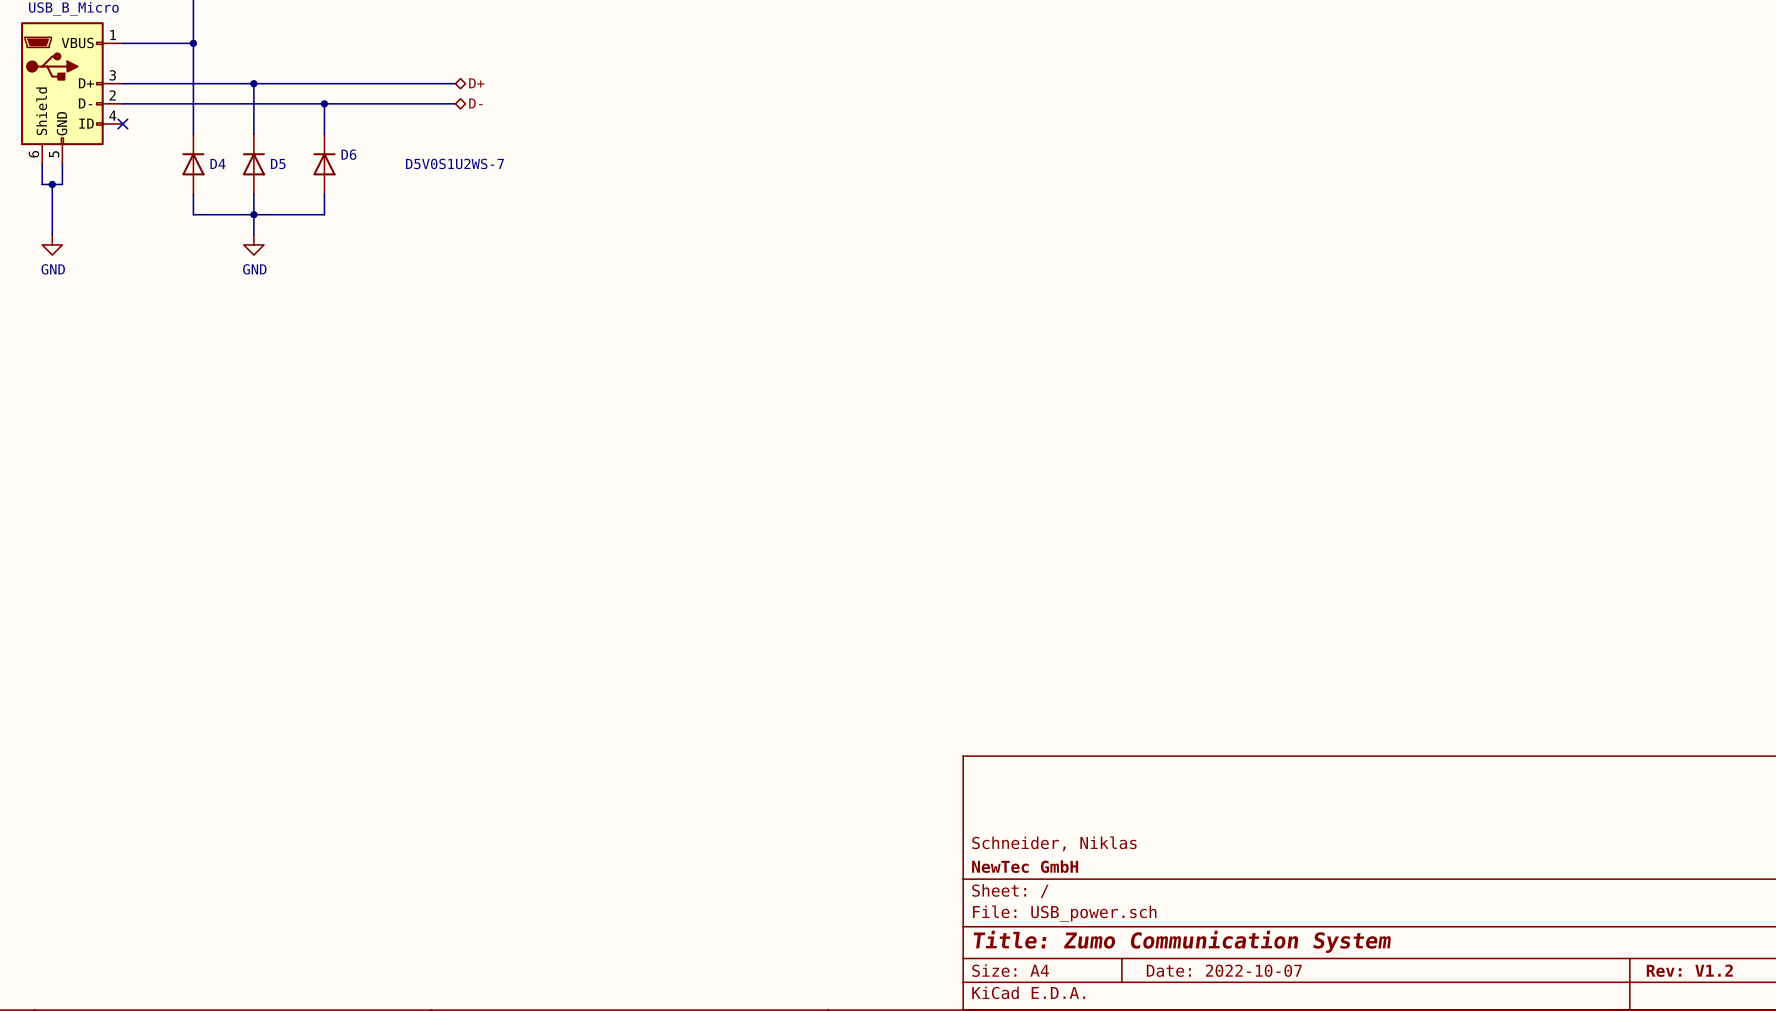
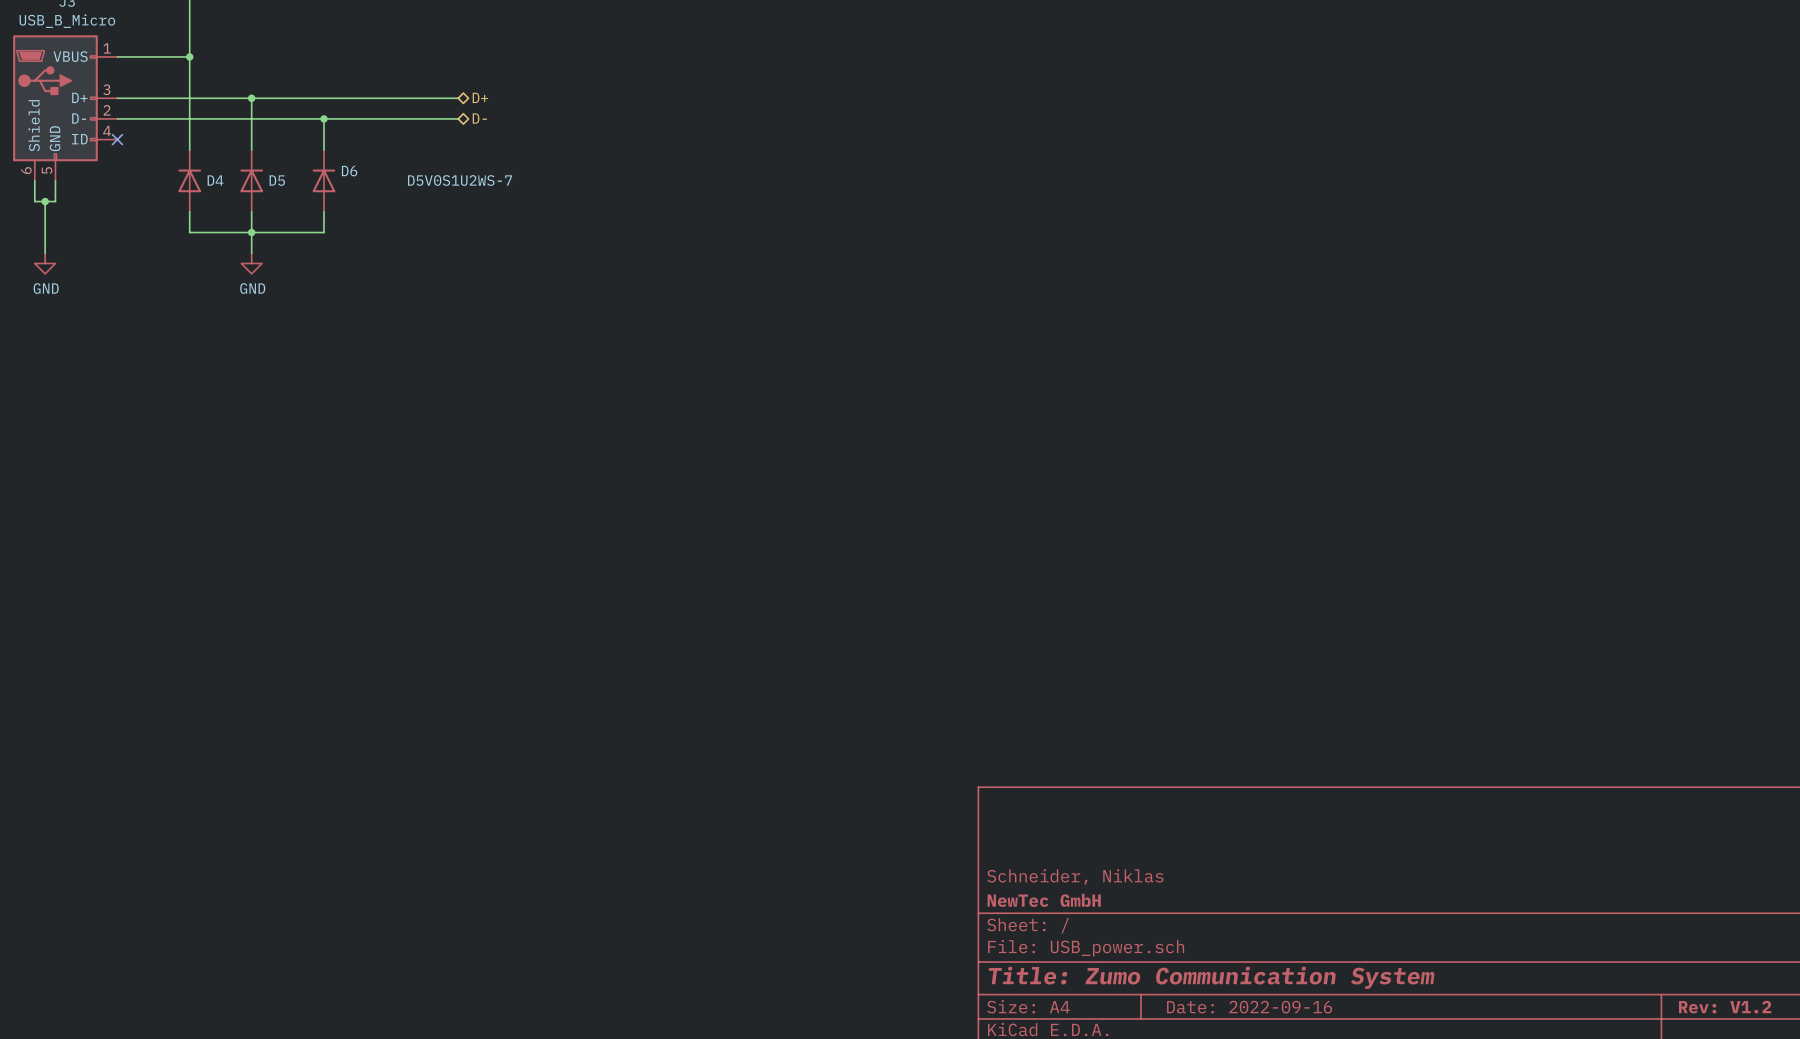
title block: Date: 2022-10-07 (1224, 970) -> Date: 2022-09-16 (1249, 1007)

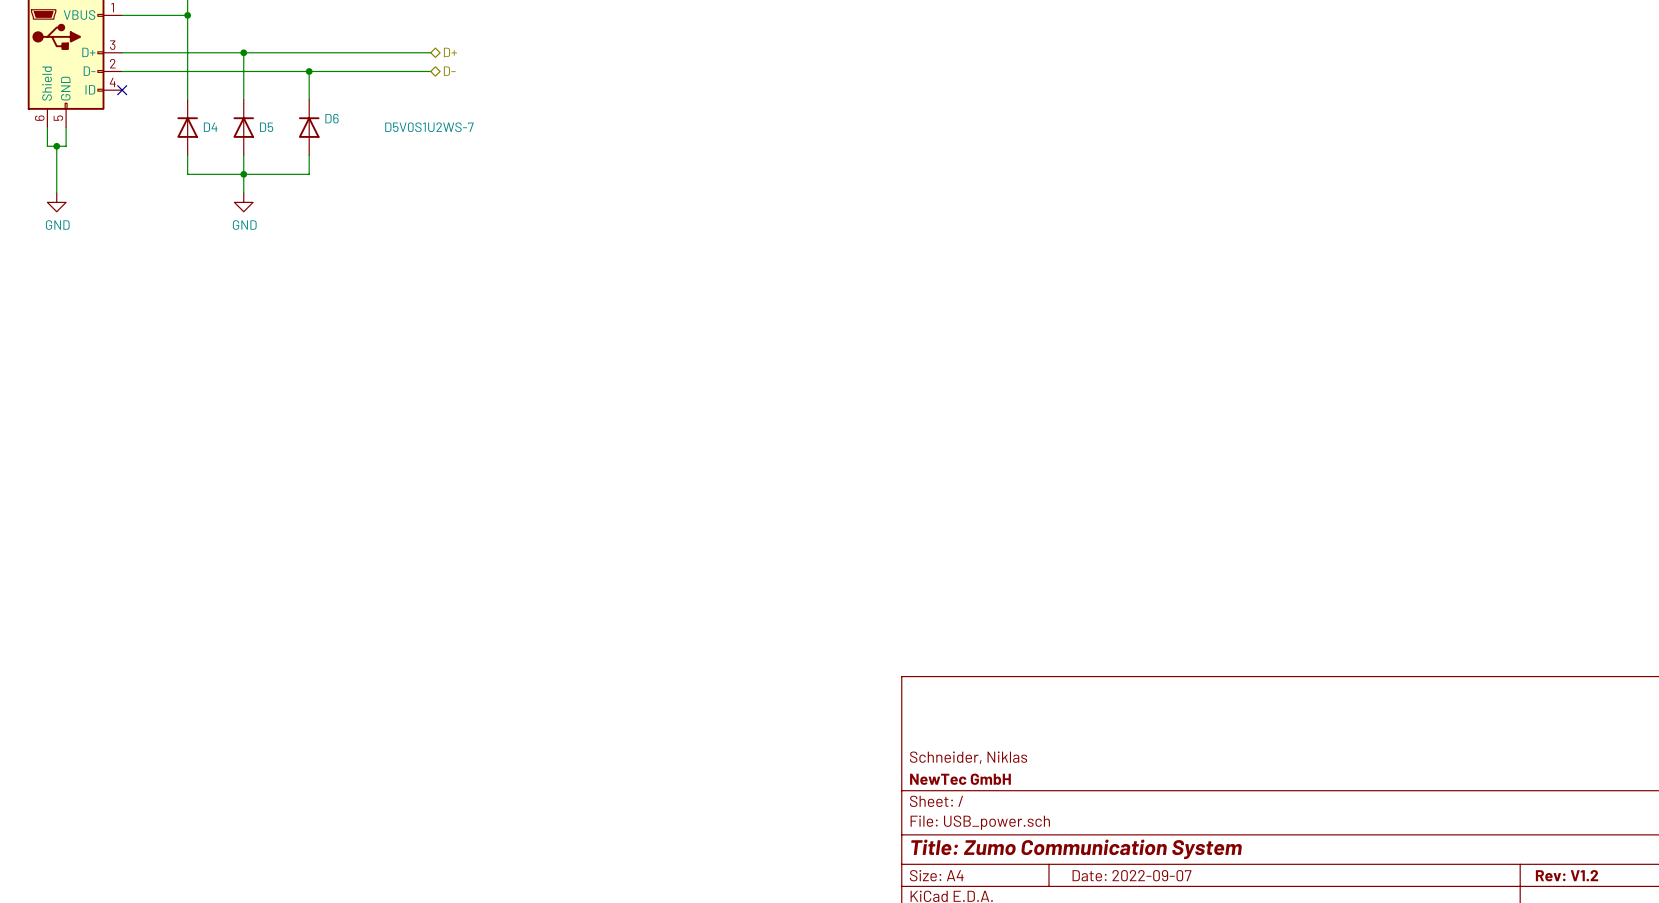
title block: Date: 2022-09-16 (1249, 1007) -> Date: 2022-09-07 (1131, 875)

